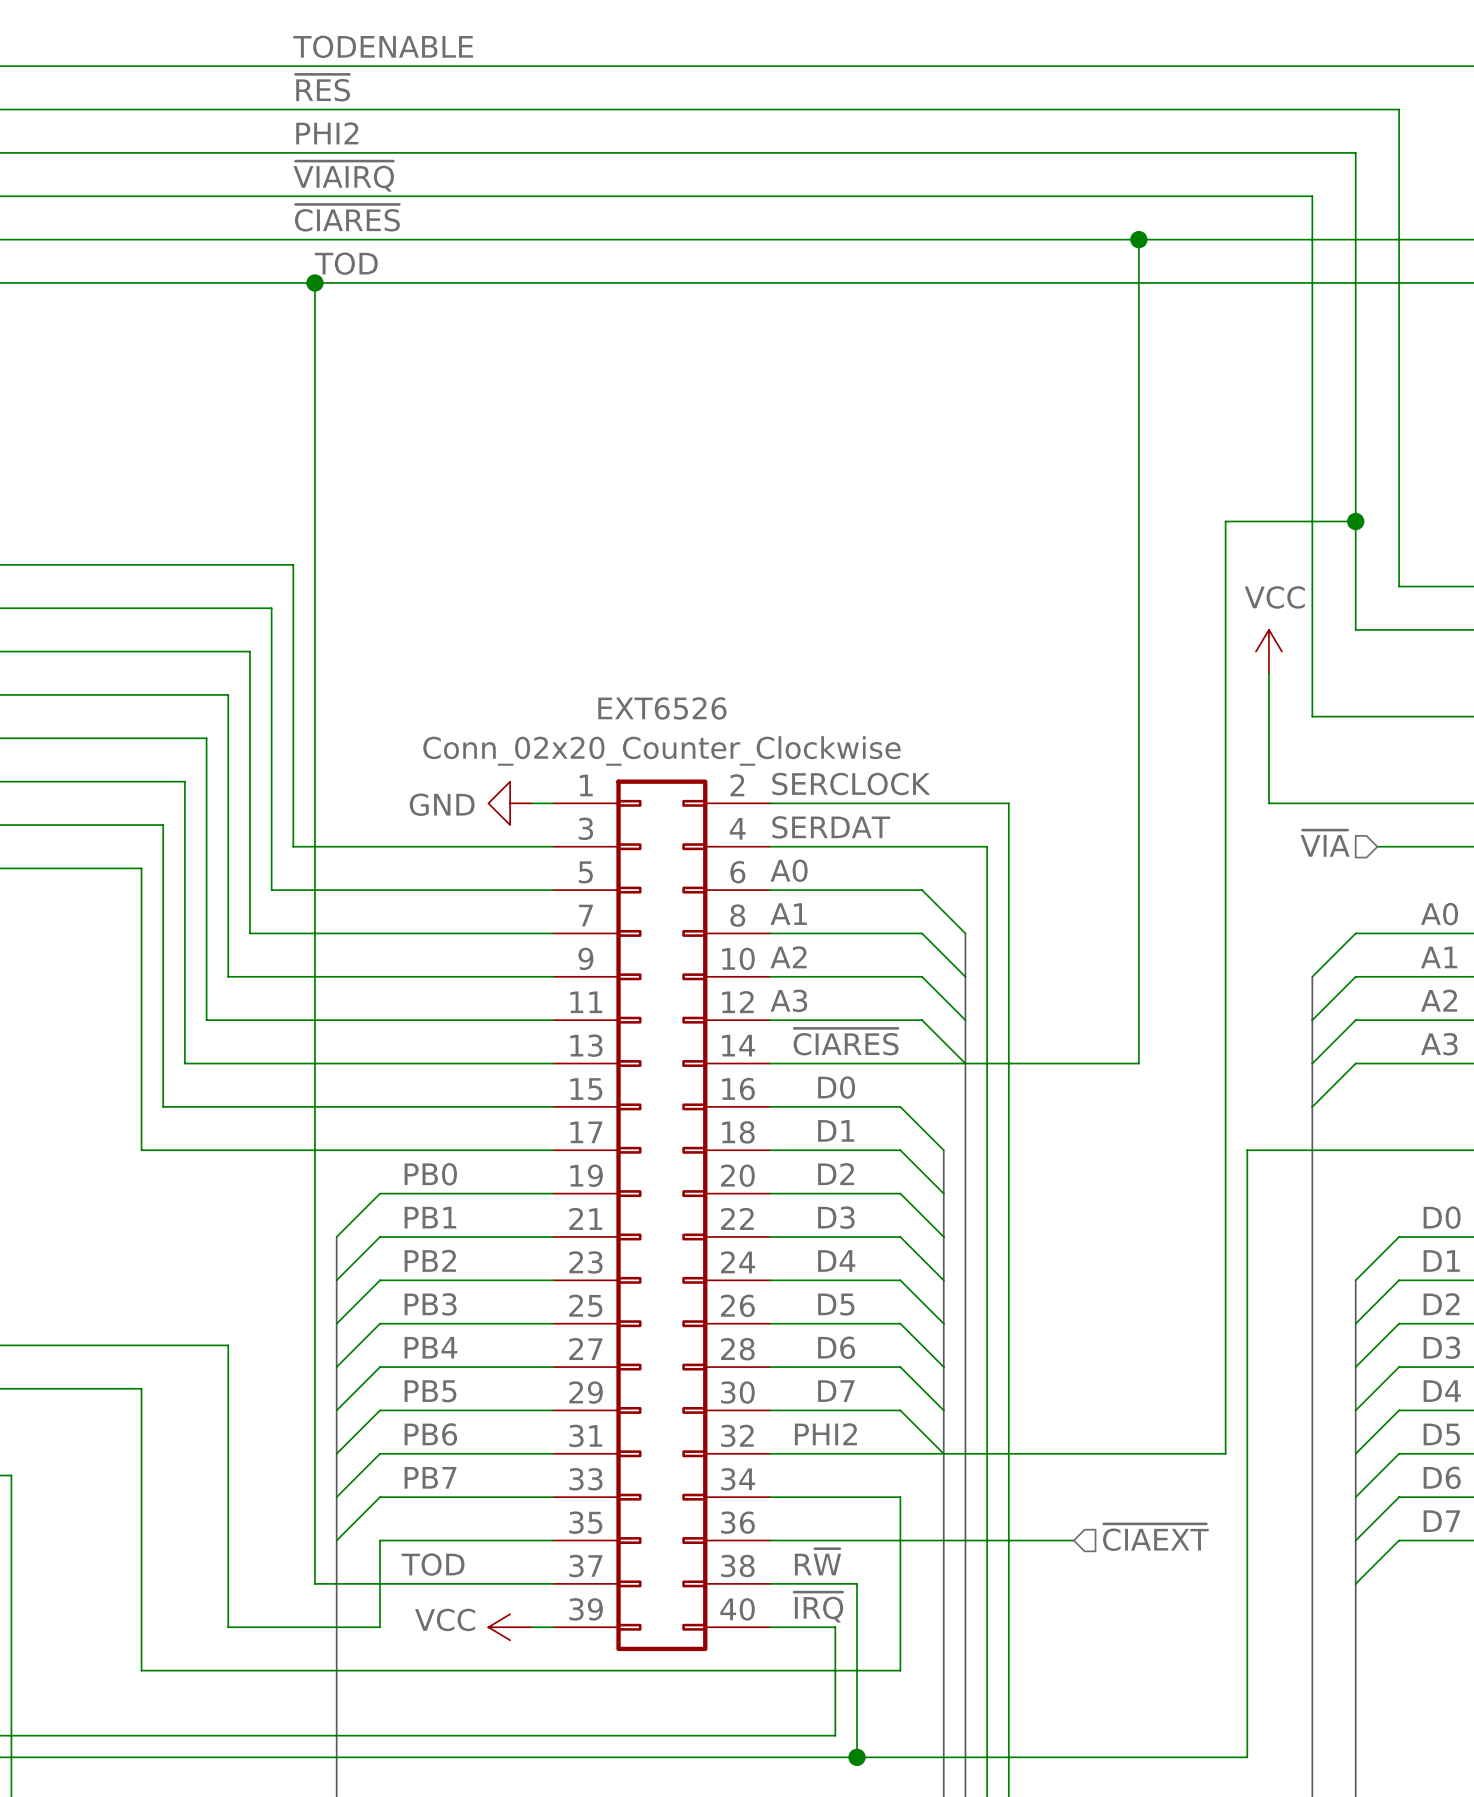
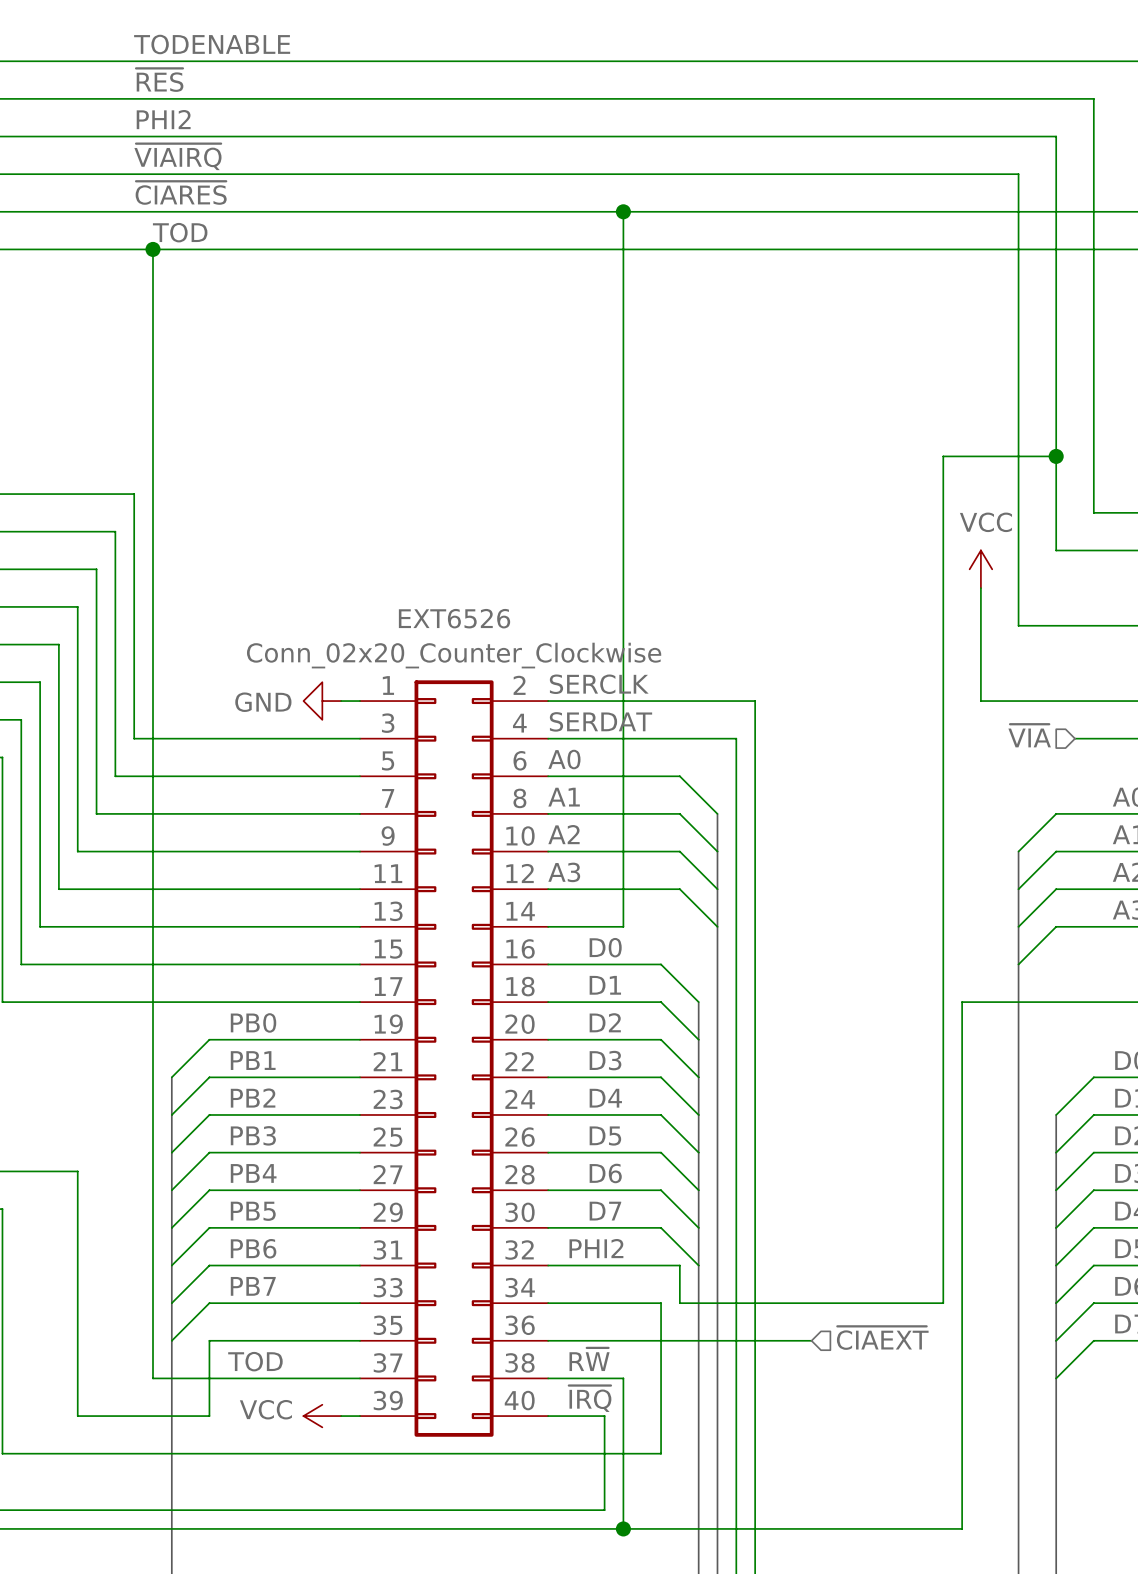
junction: none -> (623, 211)
wire: (1138, 239) (1138, 1063) (857, 1063) -> (623, 211) (623, 926)
junction: (1138, 239) -> none
label: SERCLOCK (851, 784) -> SERCLK (599, 684)
label: ~{CIARES} (846, 1041) -> none
wire: (922, 1453) (1225, 1453) -> (679, 1265) (679, 1303) (943, 1303) (943, 1265)

